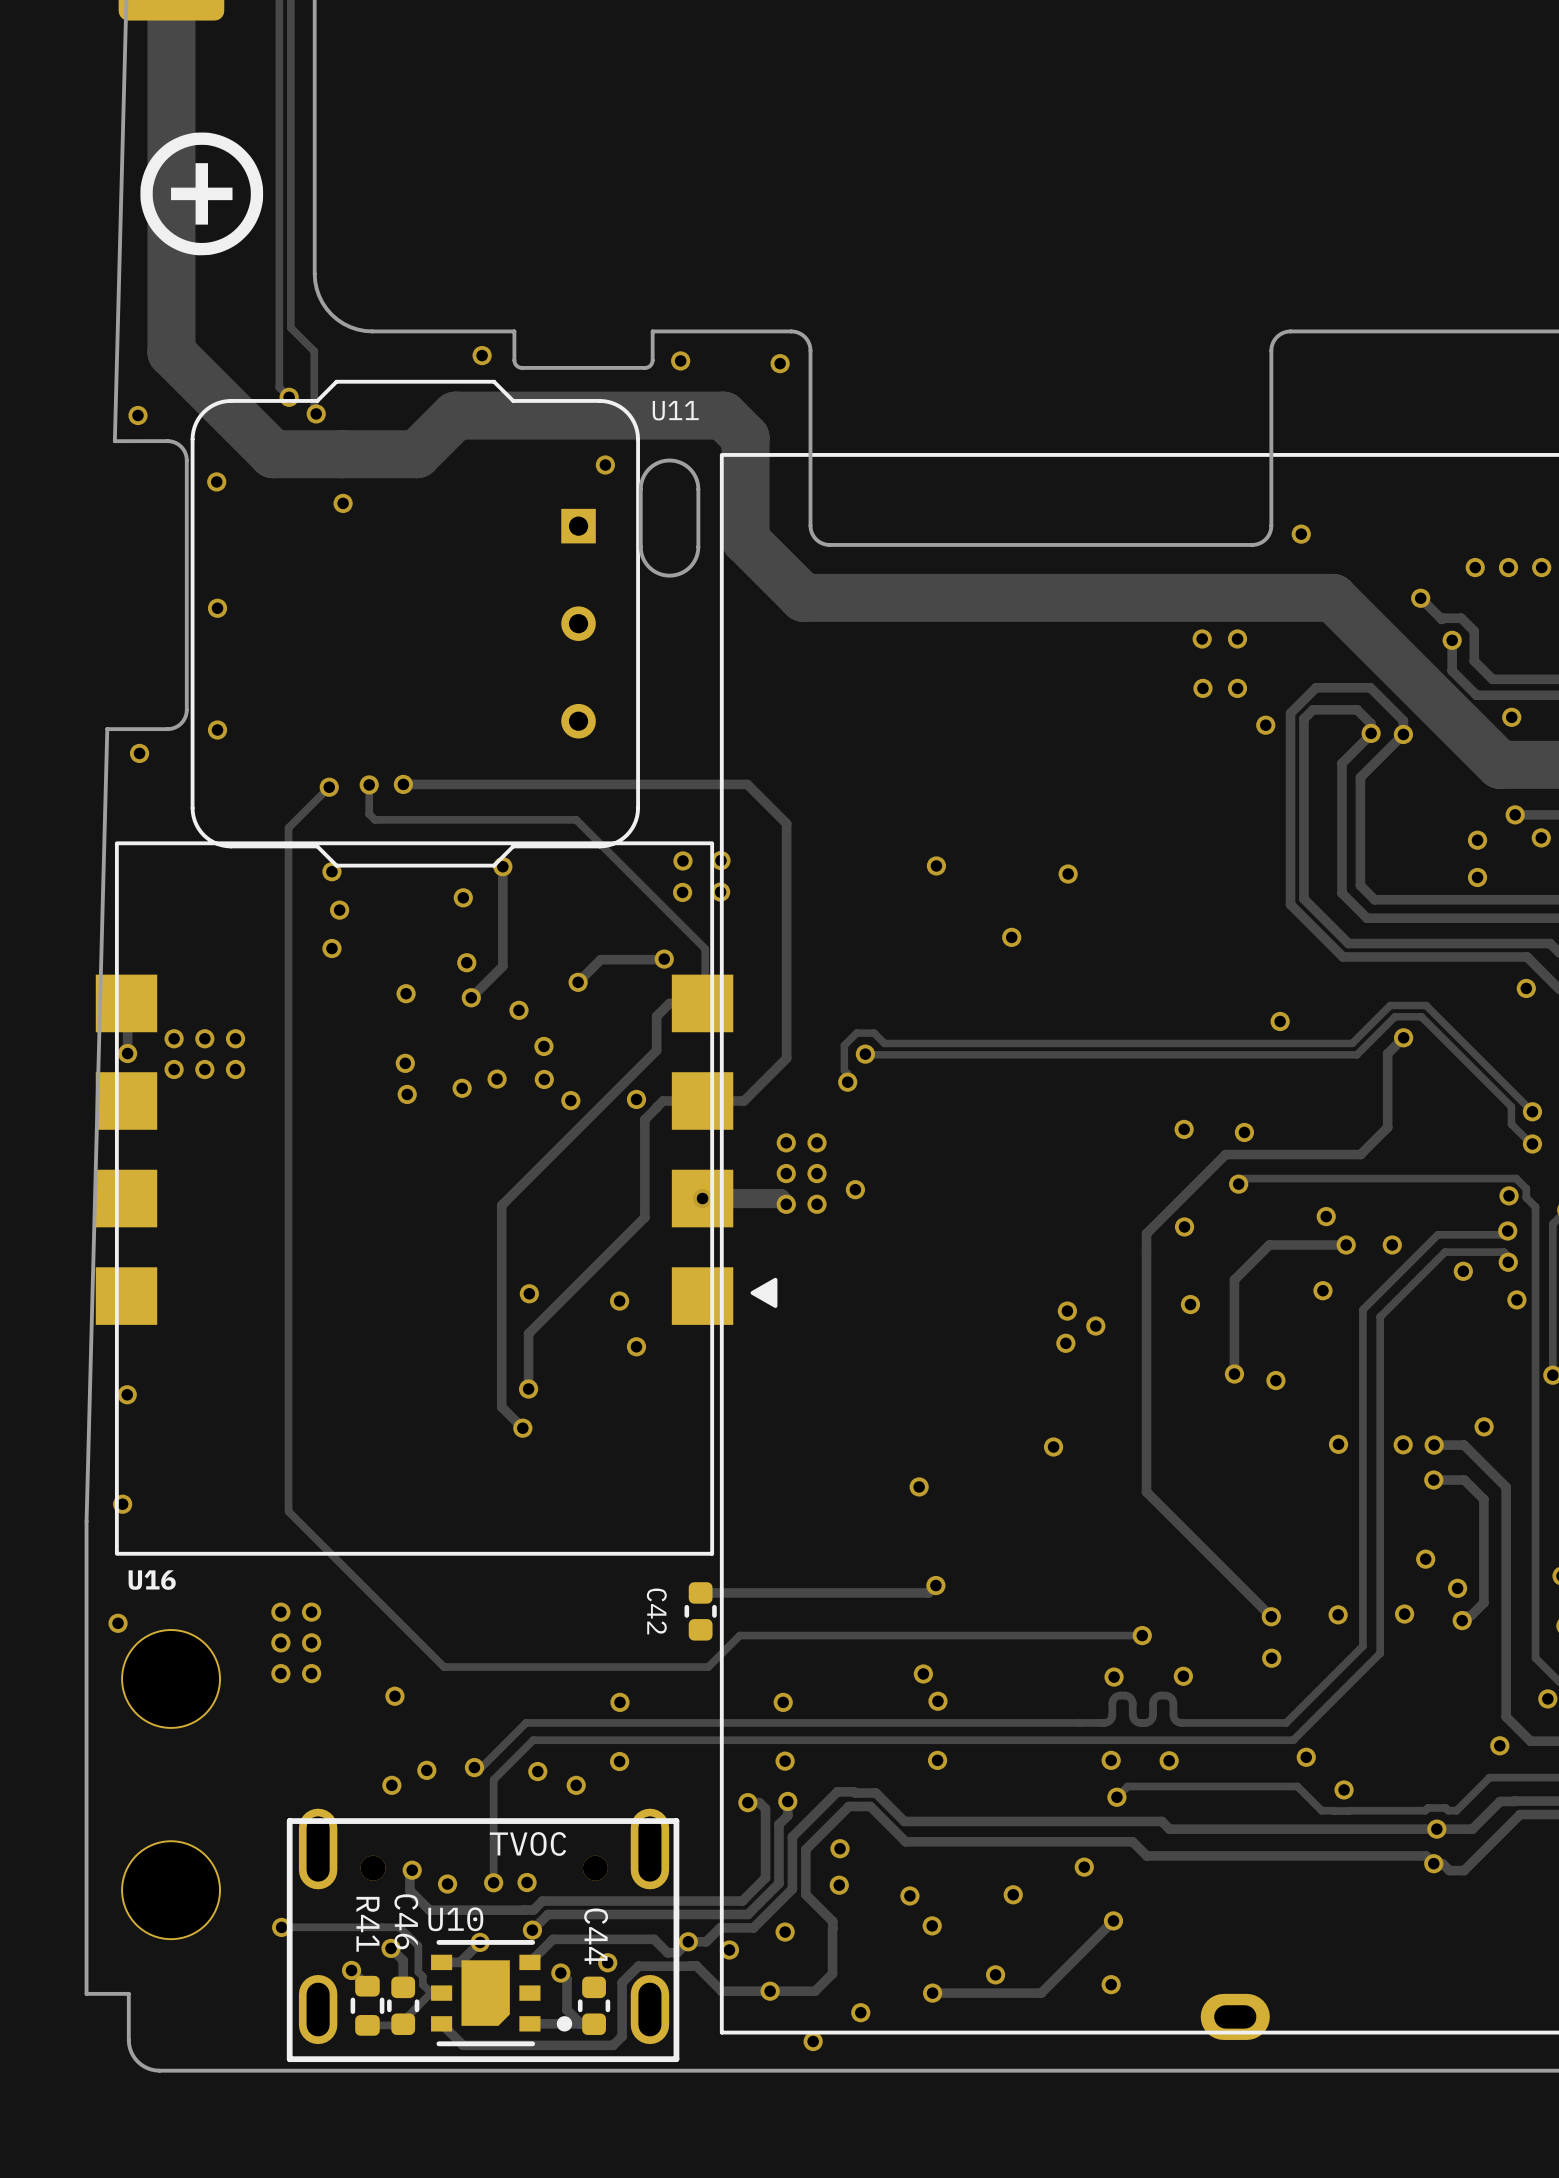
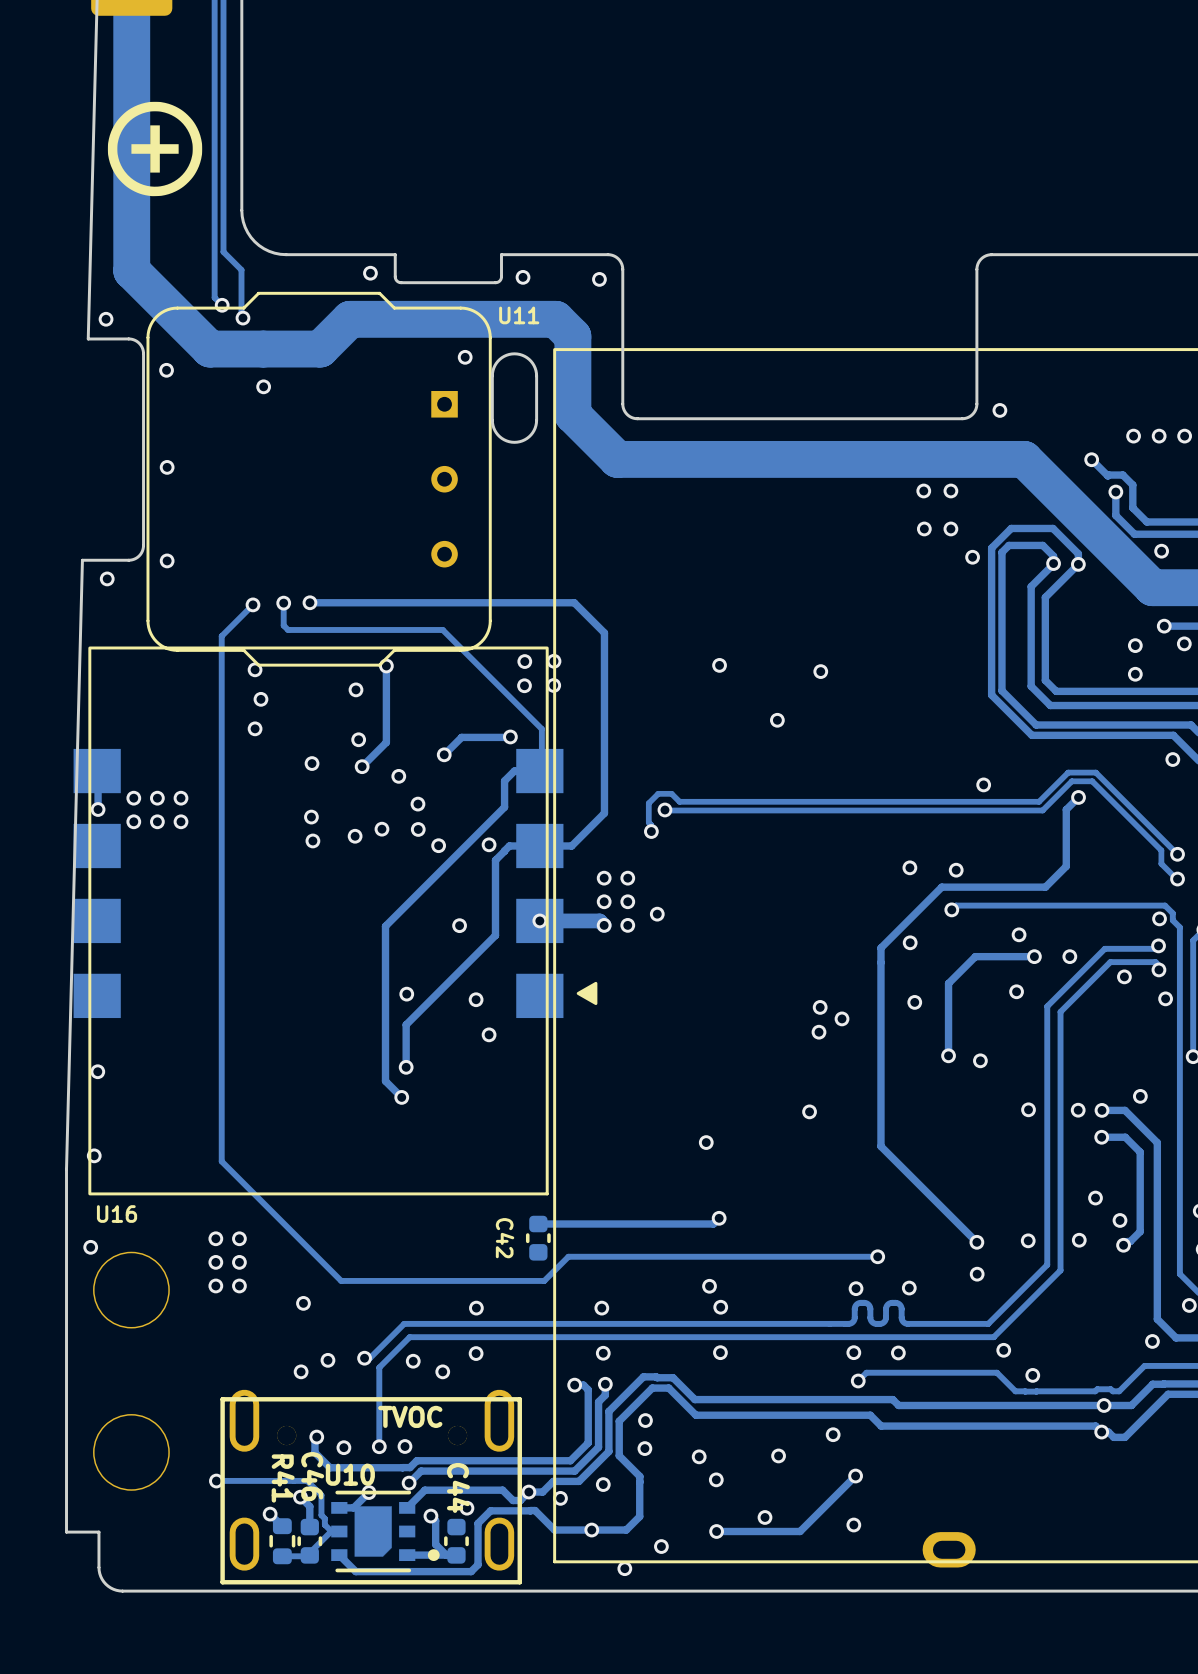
via: none -> (459, 925)

